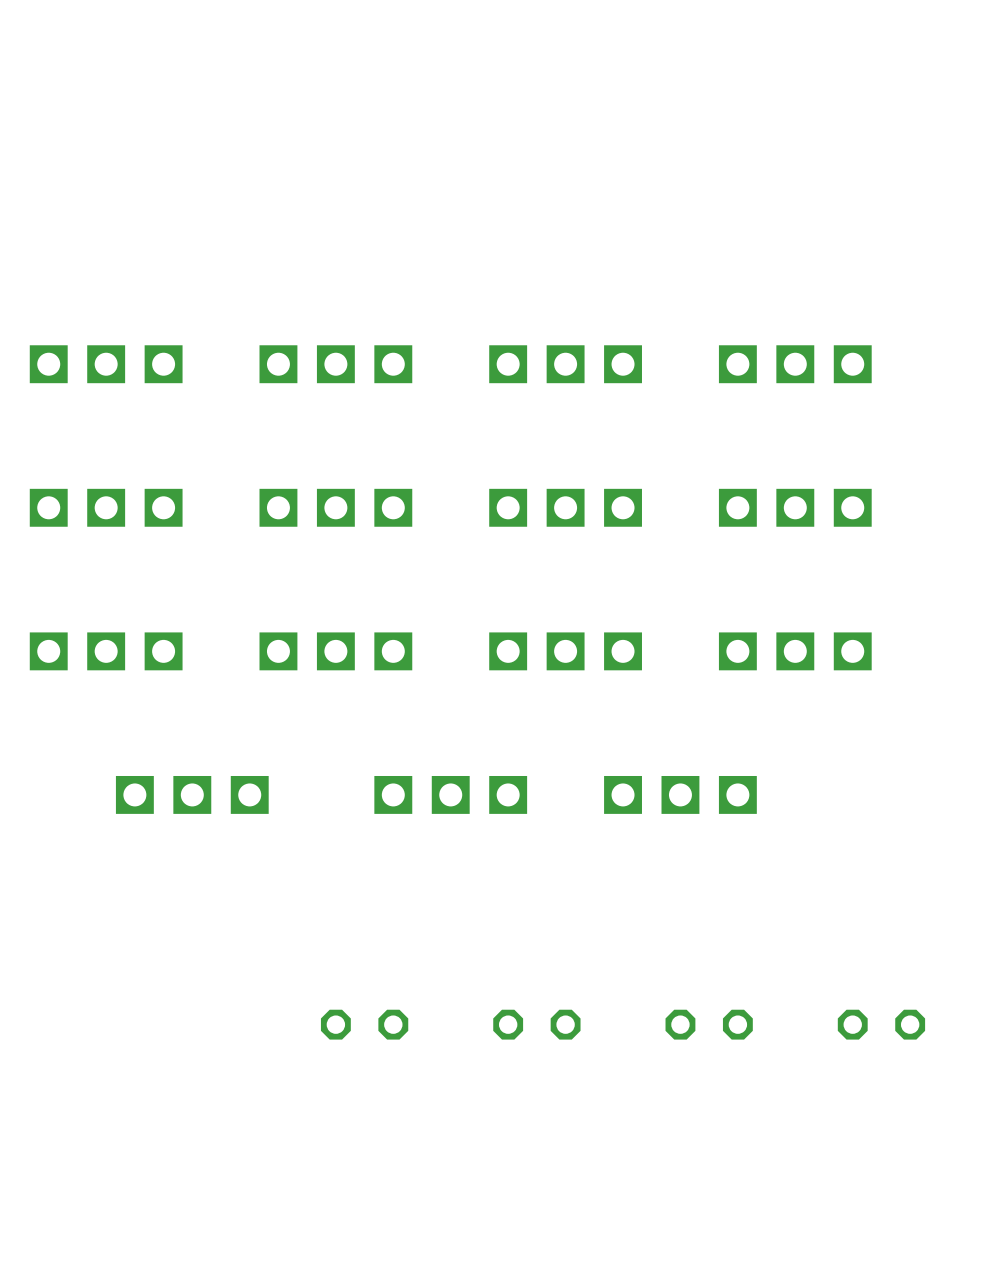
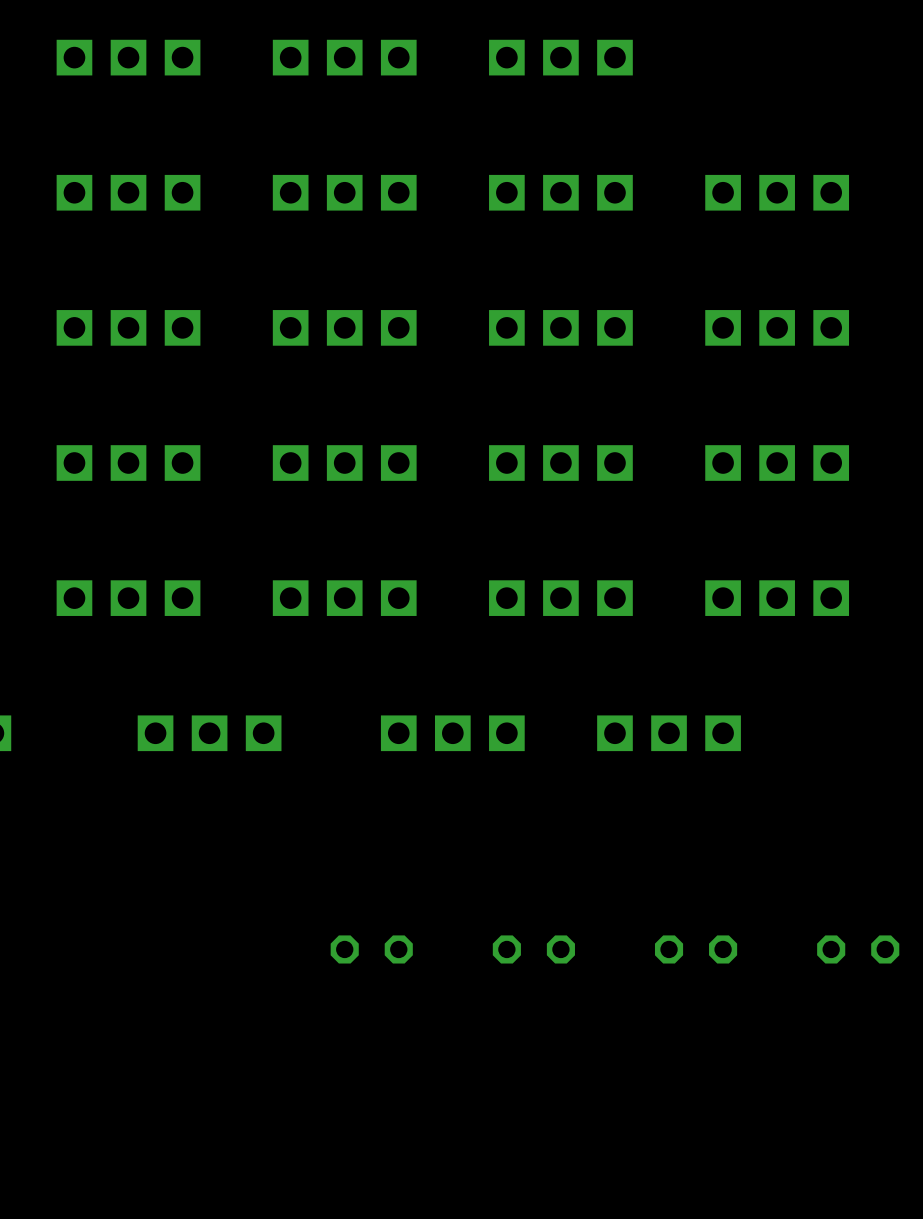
part: none -> (128, 57)
part: none -> (344, 57)
part: none -> (560, 57)
part: none -> (128, 192)
part: none -> (344, 192)
part: none -> (560, 192)
part: none -> (777, 192)

